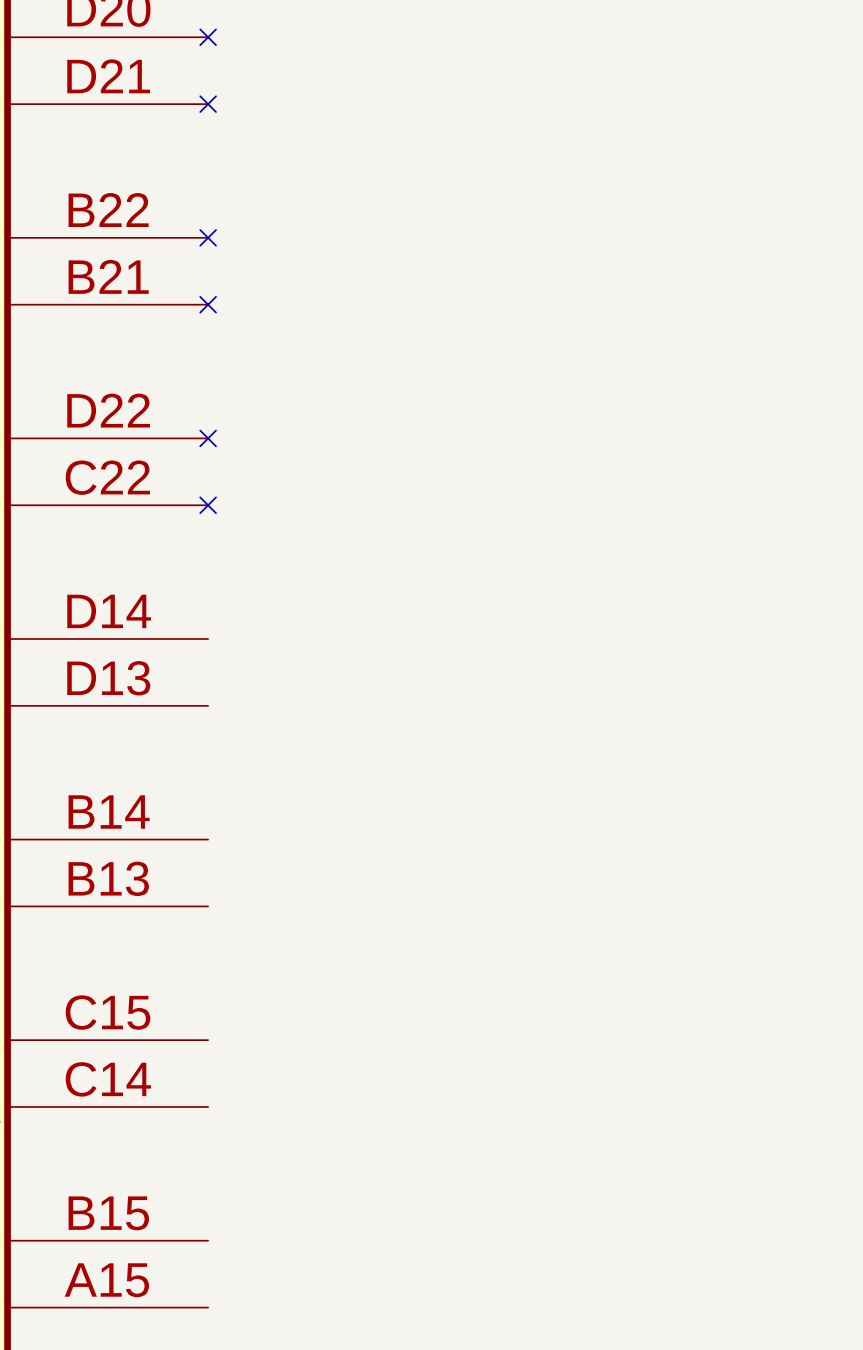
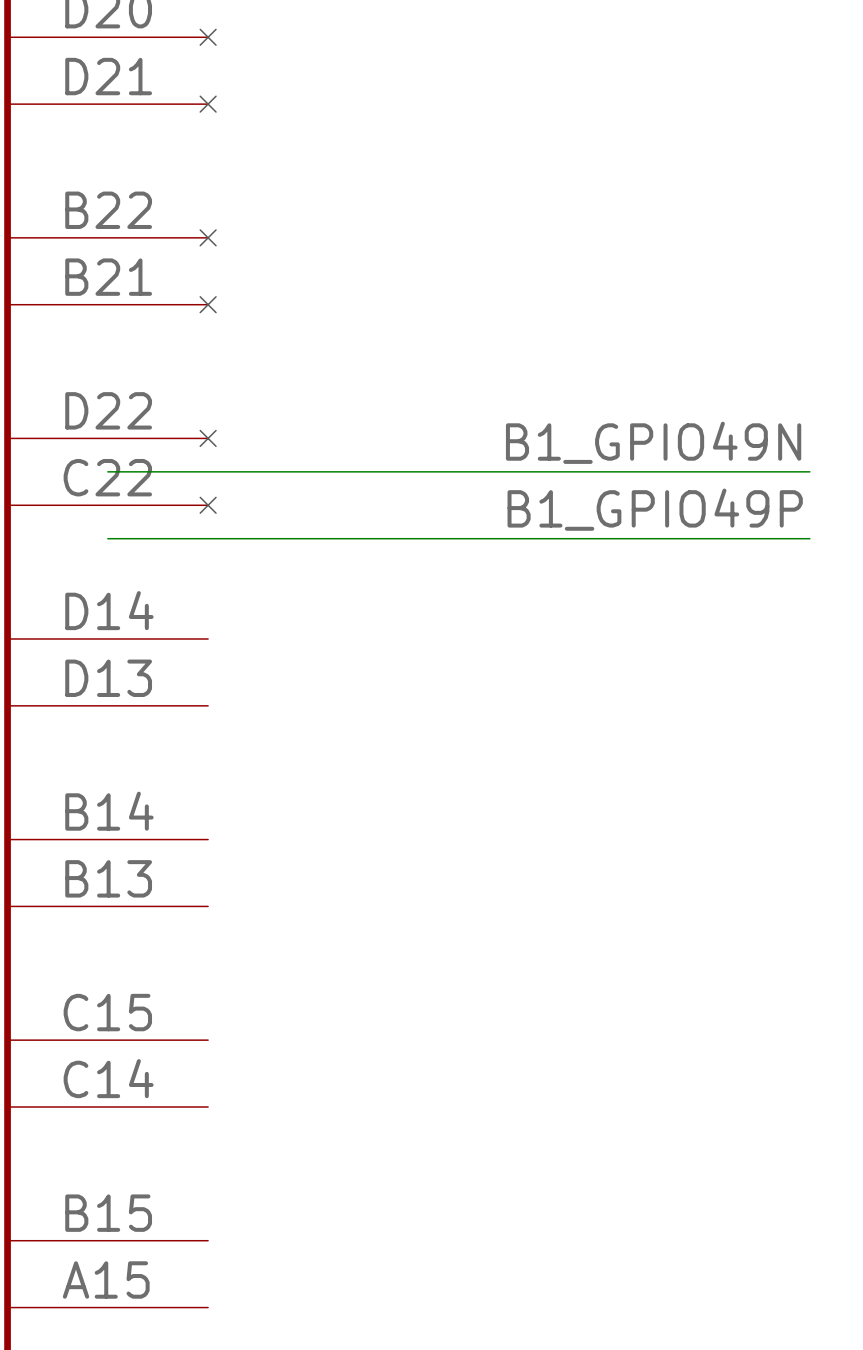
label: none -> B1_GPIO49N (653, 442)
wire: none -> (107, 471) (809, 471)
label: none -> B1_GPIO49P (655, 509)
wire: none -> (107, 538) (809, 538)

